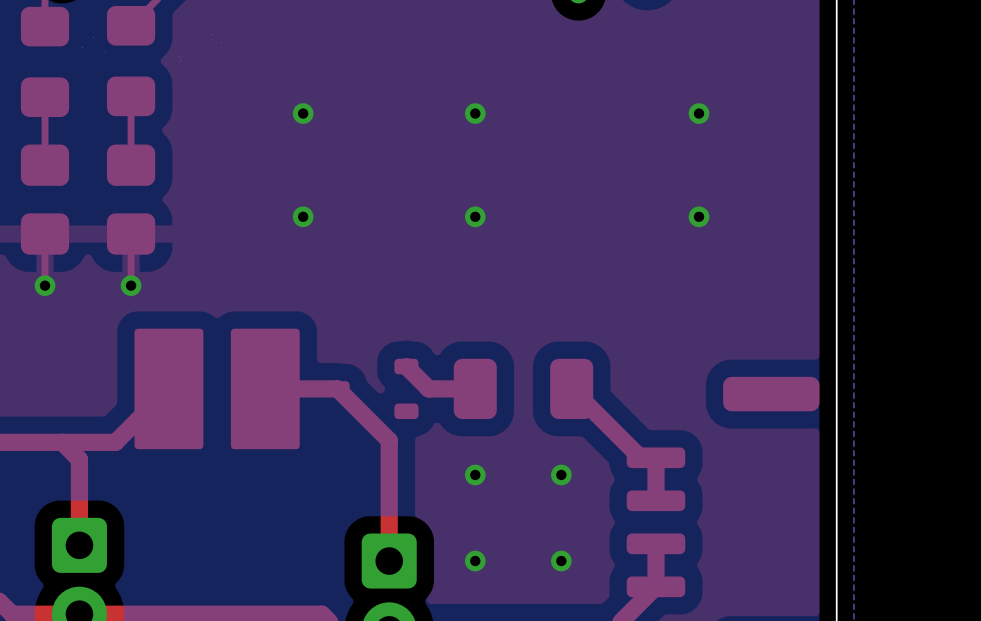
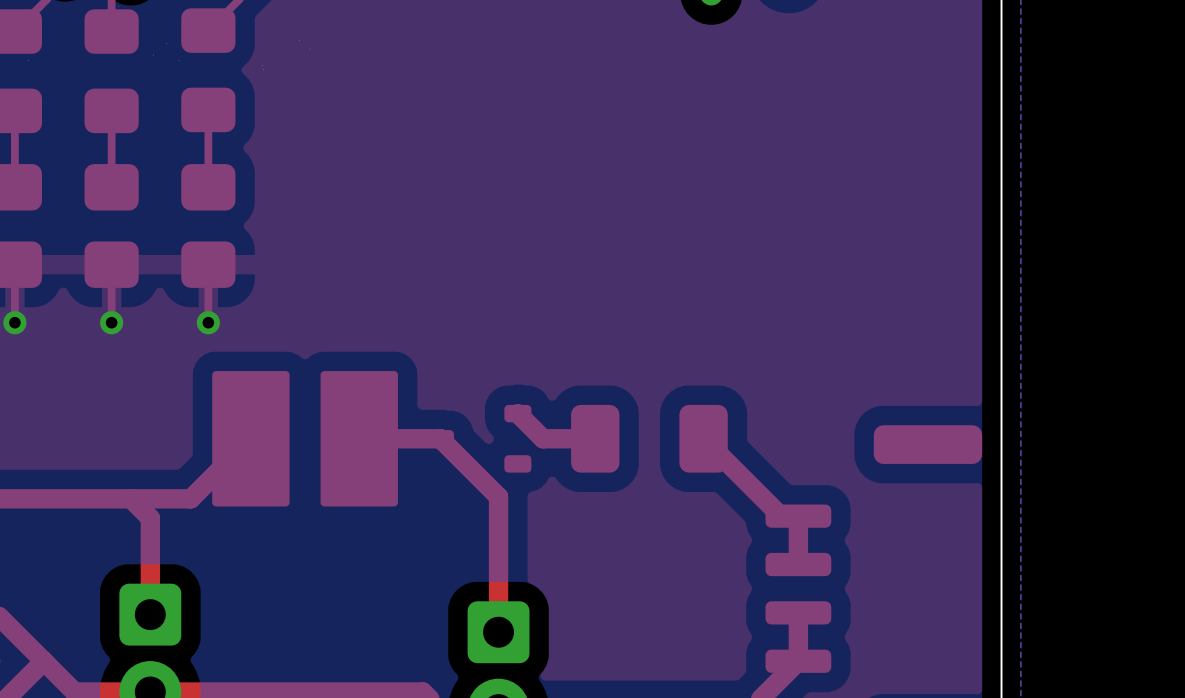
via: (303, 113) -> none
via: (475, 113) -> none
via: (699, 113) -> none
via: (303, 216) -> none
via: (475, 216) -> none
via: (699, 216) -> none
via: (475, 474) -> none
via: (561, 474) -> none
via: (475, 561) -> none
via: (561, 561) -> none

